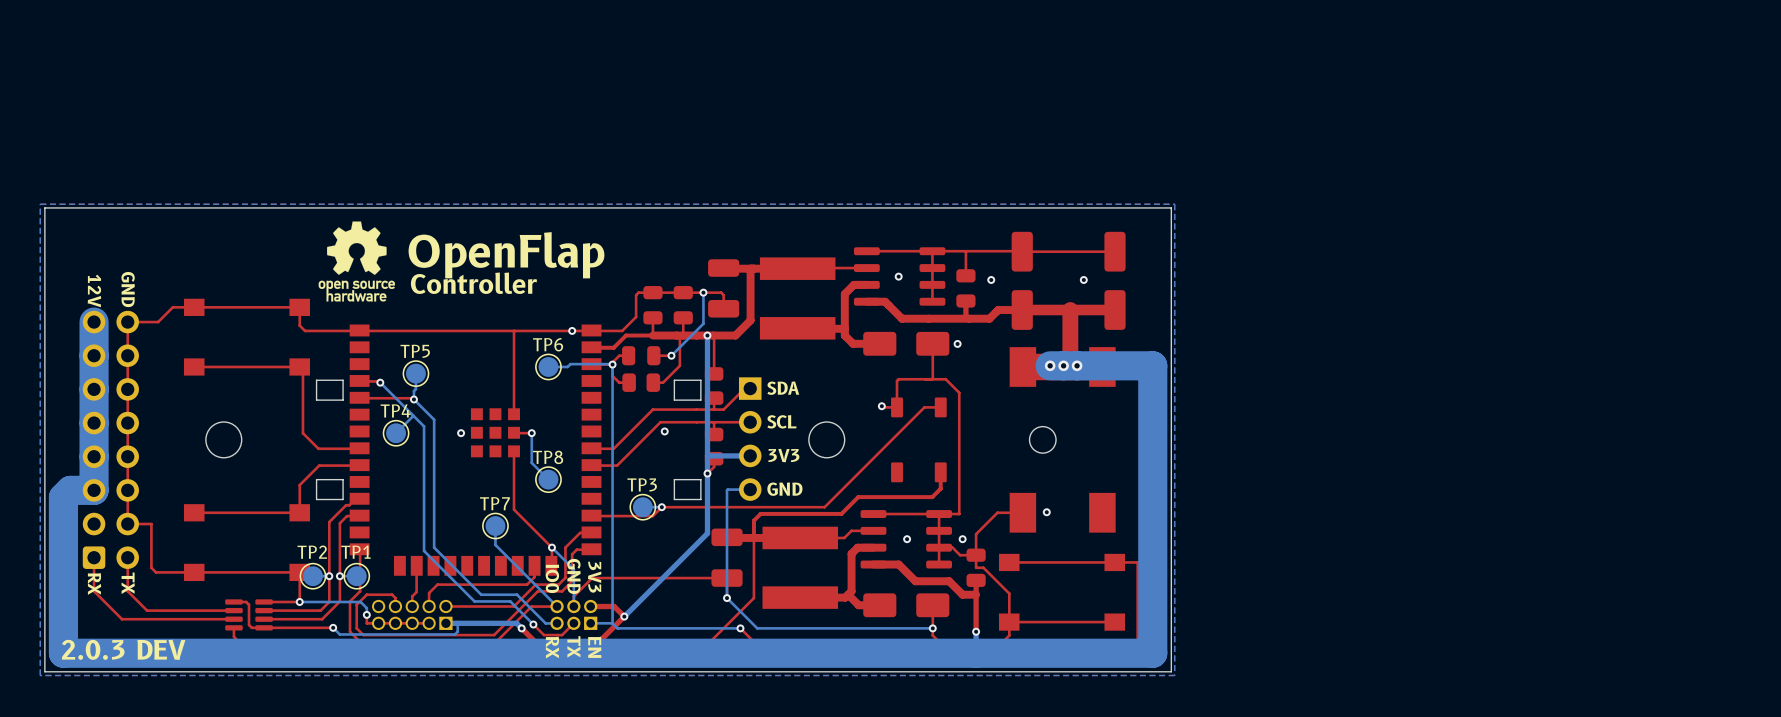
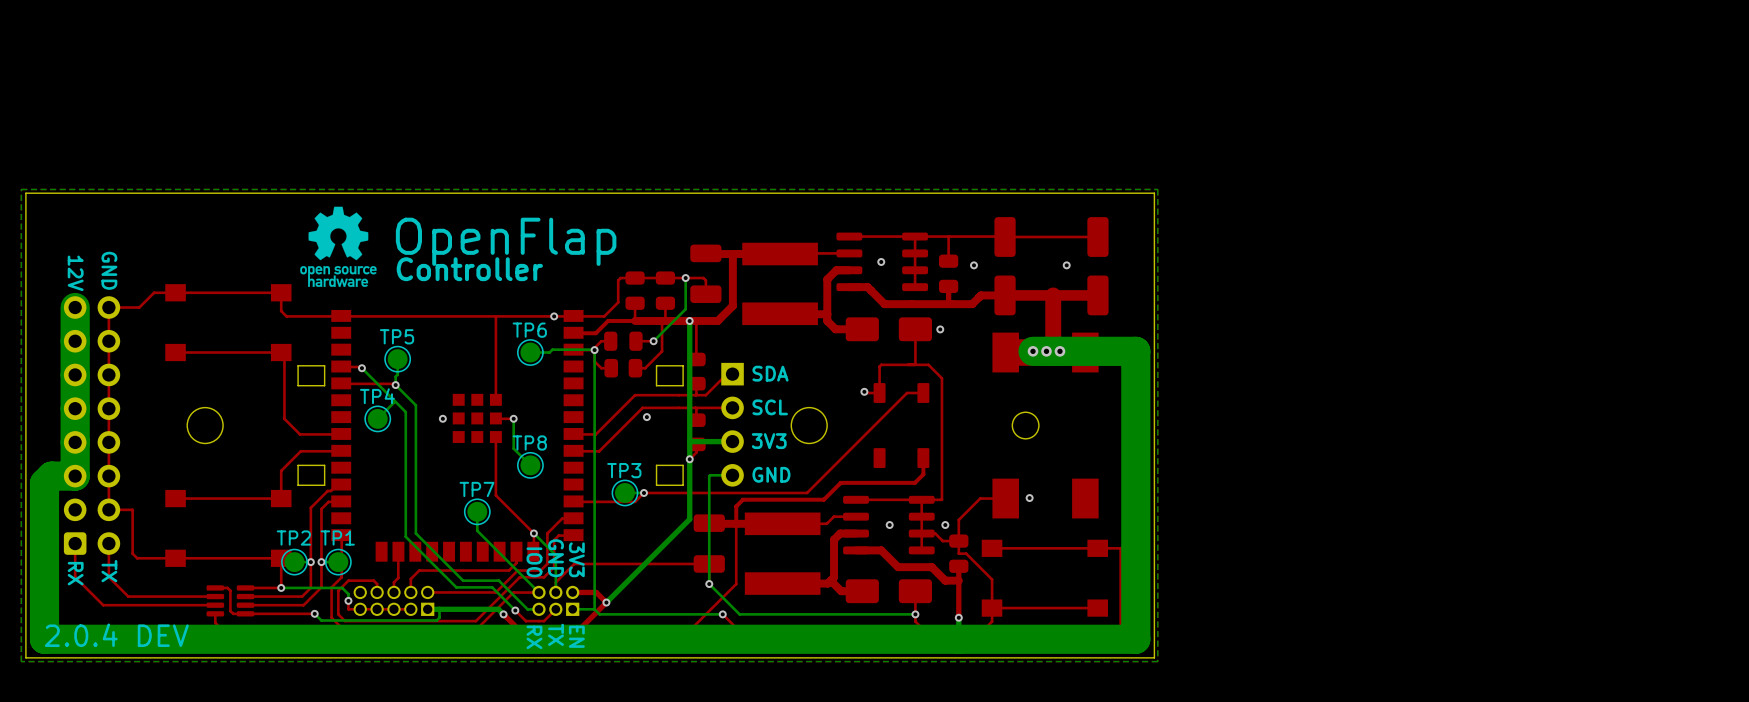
text: 2.0.3 DEV (123, 649) -> 2.0.4 DEV (116, 635)

